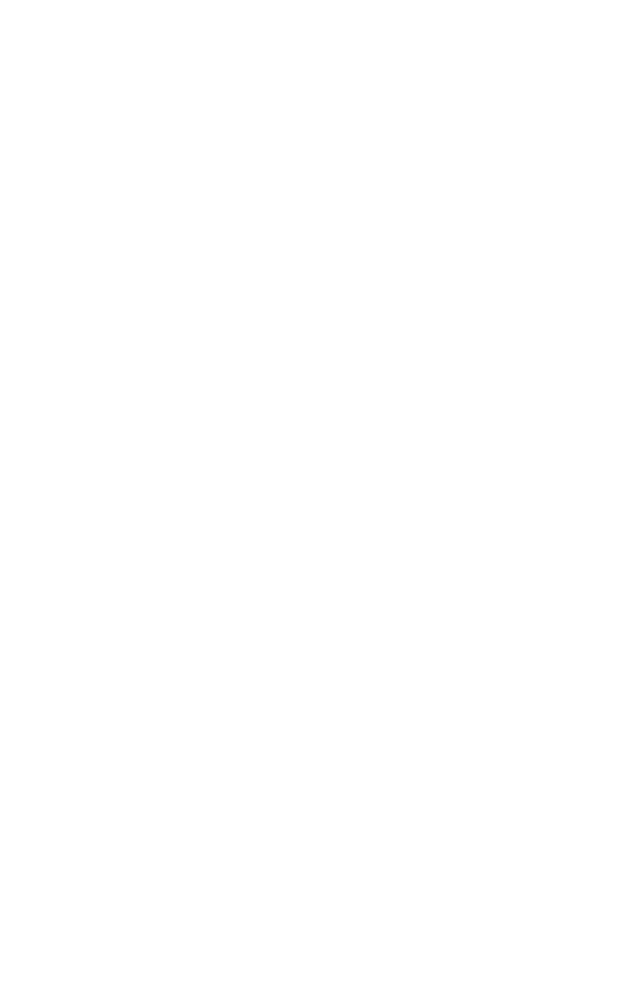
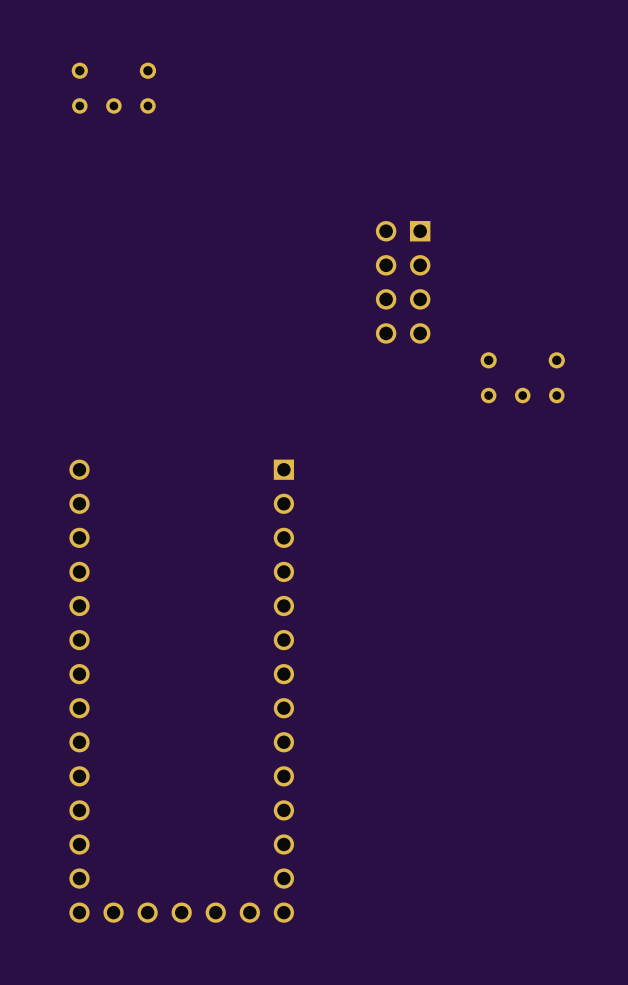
part: none -> (113, 88)
part: none -> (403, 282)
part: none -> (522, 377)
part: none -> (181, 691)

